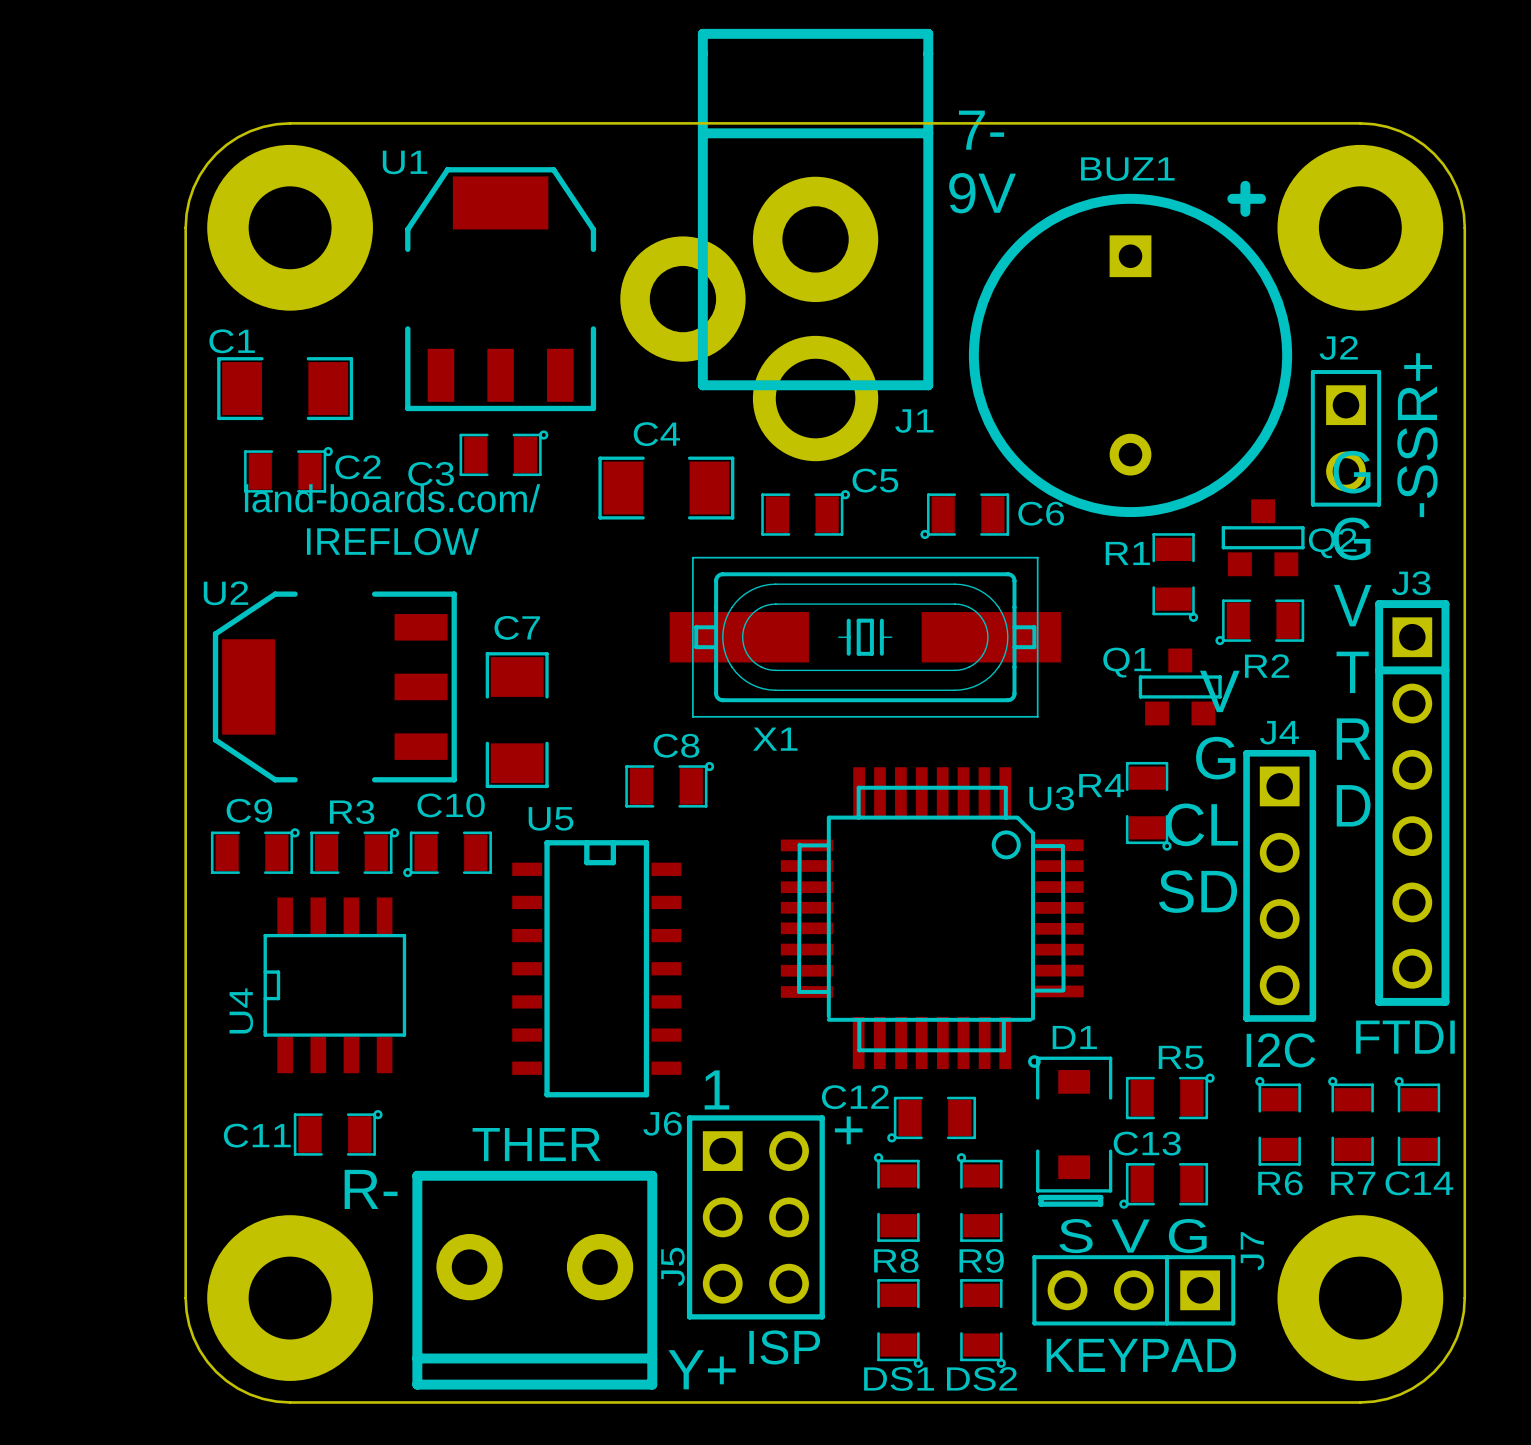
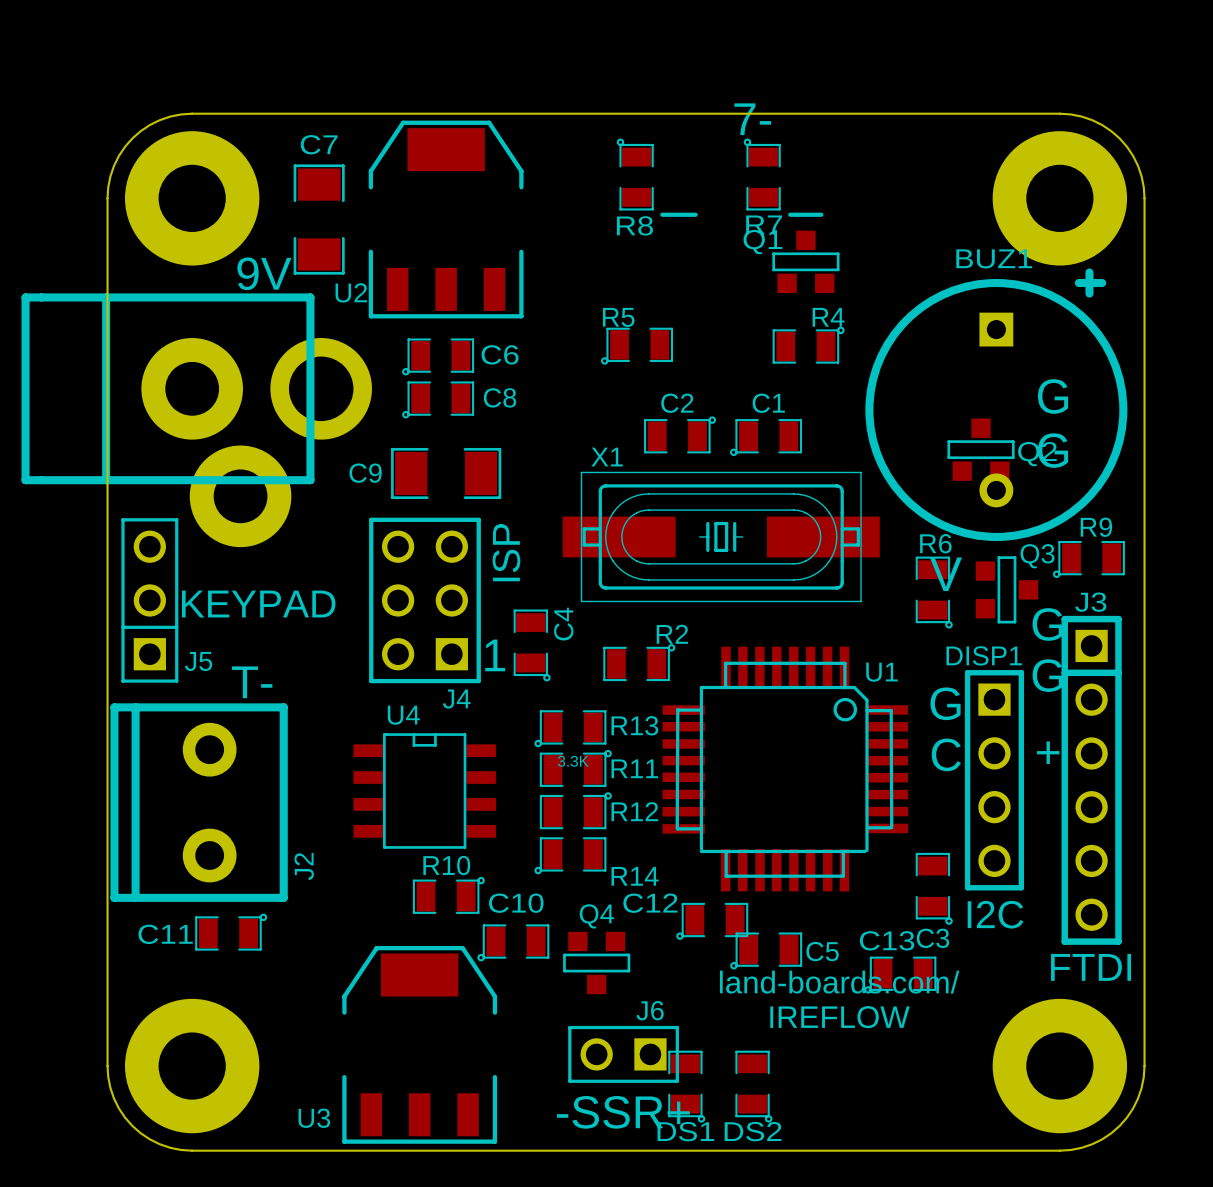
U1 name position: U1 (405, 162) -> U1 (881, 672)
U1 footprint: [405, 167, 597, 412] -> [662, 646, 909, 892]
text position: 9V (982, 193) -> 9V (264, 273)
J1: (776, 245) -> none
line: none -> (662, 214) (695, 214)
line: none -> (790, 214) (821, 214)
C1 name position: C1 (232, 341) -> C1 (768, 403)
J2 name position: J2 (1338, 347) -> J2 (304, 866)
BUZ1 position: (1130, 348) -> (996, 404)
C1 footprint: [217, 357, 354, 421] -> [730, 419, 803, 457]
J2 footprint: [1310, 370, 1382, 507] -> [110, 703, 288, 902]
C4 name position: C4 (656, 434) -> C4 (563, 624)
text: -SSR+ (1417, 435) -> none
C3 rotation: 0° (503, 453) -> 90° clockwise (934, 888)
C3 position: (503, 453) -> (934, 888)
C4 footprint: [598, 456, 735, 520] -> [513, 609, 551, 682]
C2 name position: C2 (358, 467) -> C2 (677, 403)
C2 position: (288, 469) -> (680, 434)
C3 name position: C3 (431, 473) -> C3 (932, 938)
text: land-boards.com/ (392, 498) -> none
part: none -> (196, 420)
C5 rotation: 0° (805, 512) -> 180° (766, 950)
C5 position: (805, 512) -> (766, 950)
C6 position: (964, 516) -> (438, 356)
text: IREFLOW (392, 541) -> none
R1: (1175, 577) -> none
U2 name position: U2 (225, 593) -> U2 (351, 292)
text: V (1352, 605) -> none
R2 rotation: 0° (1259, 622) -> 180° (639, 662)
R2 position: (1259, 622) -> (639, 662)
X1 position: (865, 637) -> (721, 536)
text: none -> ISP (506, 552)
text: T (1352, 672) -> none
U2 rotation: 0° (334, 686) -> 90° clockwise (446, 219)
U2 position: (334, 686) -> (446, 219)
Q1 position: (1180, 686) -> (805, 261)
Q3: none -> (1006, 589)
C7 position: (517, 720) -> (319, 219)
text: none -> KEYPAD (258, 604)
J4 name position: J4 (1279, 732) -> J4 (456, 699)
X1 name position: X1 (775, 739) -> X1 (607, 457)
text: R (1353, 739) -> G (1047, 624)
C8 name position: C8 (676, 745) -> C8 (500, 397)
J4 footprint: [1243, 749, 1317, 1022] -> [369, 517, 481, 684]
text: G (1215, 758) -> none
U3 footprint: [780, 767, 1084, 1070] -> [342, 945, 498, 1144]
C8 rotation: 0° (669, 784) -> 180° (438, 399)
C8 position: (669, 784) -> (438, 399)
R4 name position: R4 (1101, 785) -> R4 (828, 317)
U3 name position: U3 (1051, 798) -> U3 (314, 1118)
J3 position: (1412, 803) -> (1091, 780)
text: D (1353, 805) -> G (1047, 675)
R4 rotation: 0° (1148, 806) -> 90° counterclockwise (808, 345)
R4 position: (1148, 806) -> (808, 345)
C9 name position: C9 (249, 810) -> C9 (365, 473)
text: none -> T- (252, 682)
text: CL (1201, 824) -> none
C9 footprint: [210, 828, 300, 874] -> [391, 447, 502, 500]
R3: (354, 851) -> none
text: none -> G (945, 703)
C10 position: (447, 854) -> (513, 942)
R13: none -> (570, 728)
text: SD (1198, 891) -> none
text: none -> C (946, 754)
R11: none -> 3.3K (575, 768)
DISP1: none -> (994, 780)
U5: (596, 968) -> none
R12: none -> (575, 810)
U4 rotation: 0° (334, 985) -> 90° clockwise (424, 791)
U4 position: (334, 985) -> (424, 791)
text position: FTDI (1405, 1037) -> FTDI (1091, 967)
R14: none -> (570, 855)
text position: I2C (1281, 1050) -> I2C (995, 914)
R10: none -> (448, 895)
text position: 1 (716, 1089) -> 1 (495, 655)
R5 rotation: 0° (1170, 1096) -> 180° (637, 346)
R5 position: (1170, 1096) -> (637, 346)
J6 footprint: [686, 1115, 825, 1320] -> [568, 1025, 679, 1083]
R6 rotation: 0° (1278, 1121) -> 180° (934, 592)
R6 position: (1278, 1121) -> (934, 592)
R7 position: (1350, 1121) -> (762, 174)
C14: (1417, 1121) -> none
J6 name position: J6 (662, 1123) -> J6 (650, 1010)
D1: (1070, 1123) -> none
text position: + (848, 1130) -> + (1048, 752)
text: THER (536, 1144) -> none
J5 footprint: [412, 1170, 658, 1390] -> [121, 518, 179, 683]
Q4: none -> (596, 963)
text: R- (371, 1189) -> none
text: none -> land-boards.com/ (839, 982)
R8 position: (896, 1197) -> (635, 174)
R9 rotation: 0° (979, 1197) -> 90° counterclockwise (1088, 559)
R9 position: (979, 1197) -> (1088, 559)
line: (1041, 1197) (1041, 1204) (1100, 1204) (1100, 1197) (1041, 1197) -> none
text: S V G (1132, 1236) -> none
text: none -> IREFLOW (839, 1017)
R9 name position: R9 (981, 1260) -> R9 (1096, 527)
J5 name position: J5 (672, 1266) -> J5 (198, 661)
J7: (1133, 1290) -> none
text: ISP (784, 1347) -> none
text: none -> -SSR+ (623, 1112)
text: KEYPAD (1141, 1355) -> none
text: Y+ (702, 1369) -> none

